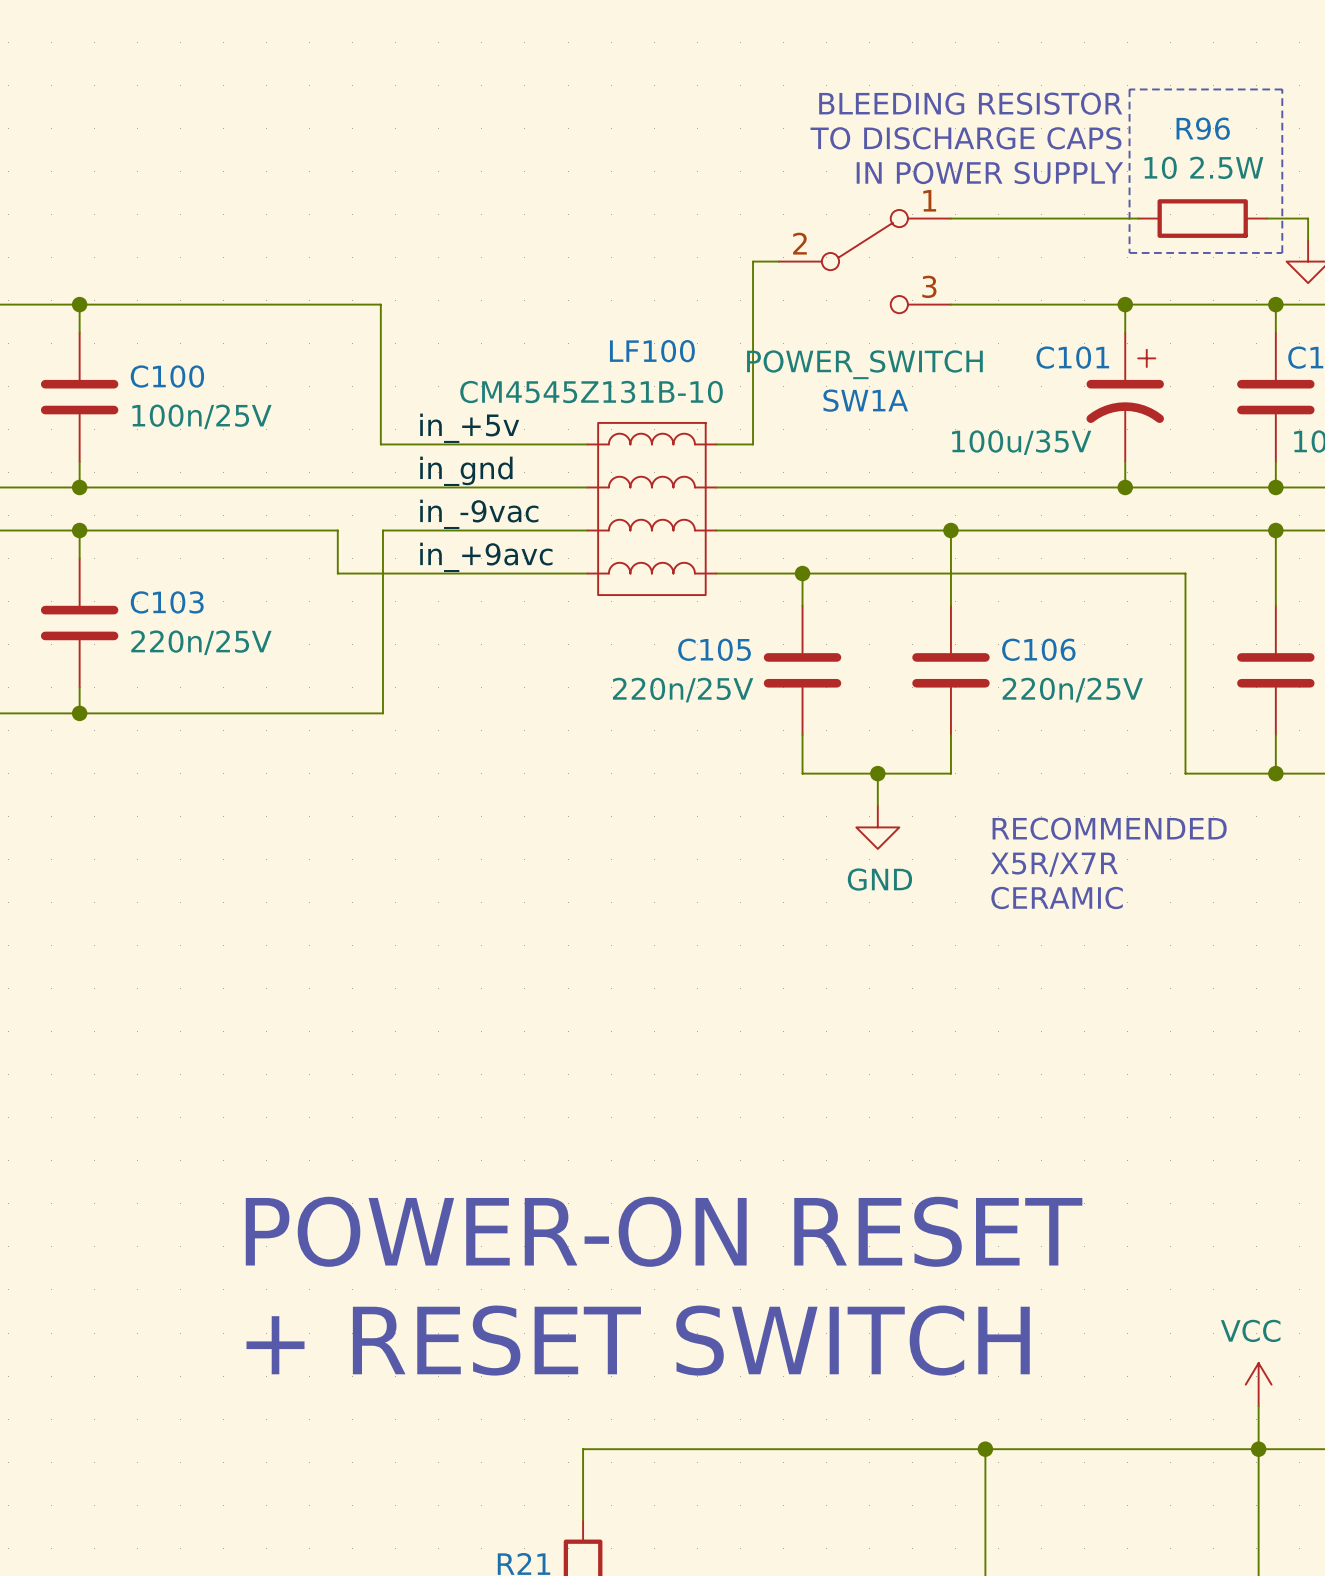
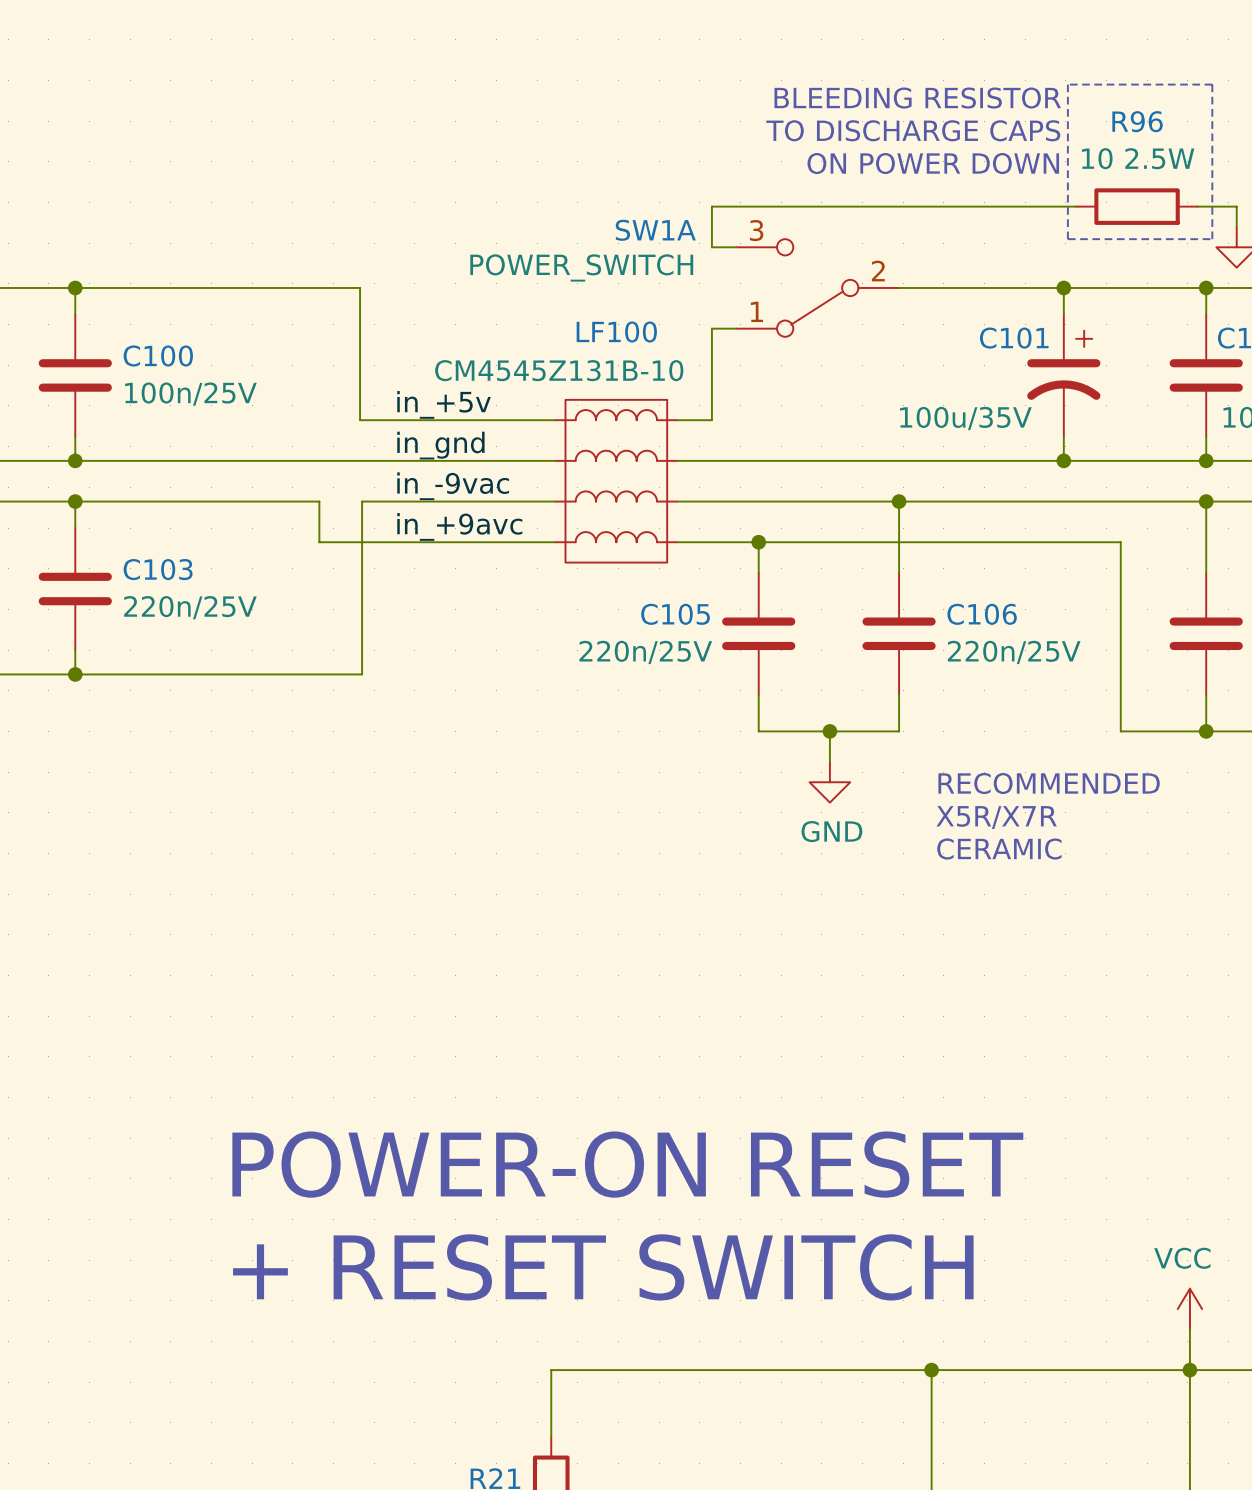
text: IN POWER SUPPLY (989, 172) -> ON POWER DOWN (933, 163)
wire: none -> (899, 206) (711, 206) (711, 247)
wire: (753, 261) (753, 347) -> (736, 328) (711, 328)
SW1A rotation: 0° (864, 261) -> 180° (817, 287)
SW1A value position: POWER_SWITCH (864, 364) -> POWER_SWITCH (581, 267)
SW1A name position: SW1A (865, 400) -> SW1A (655, 230)

